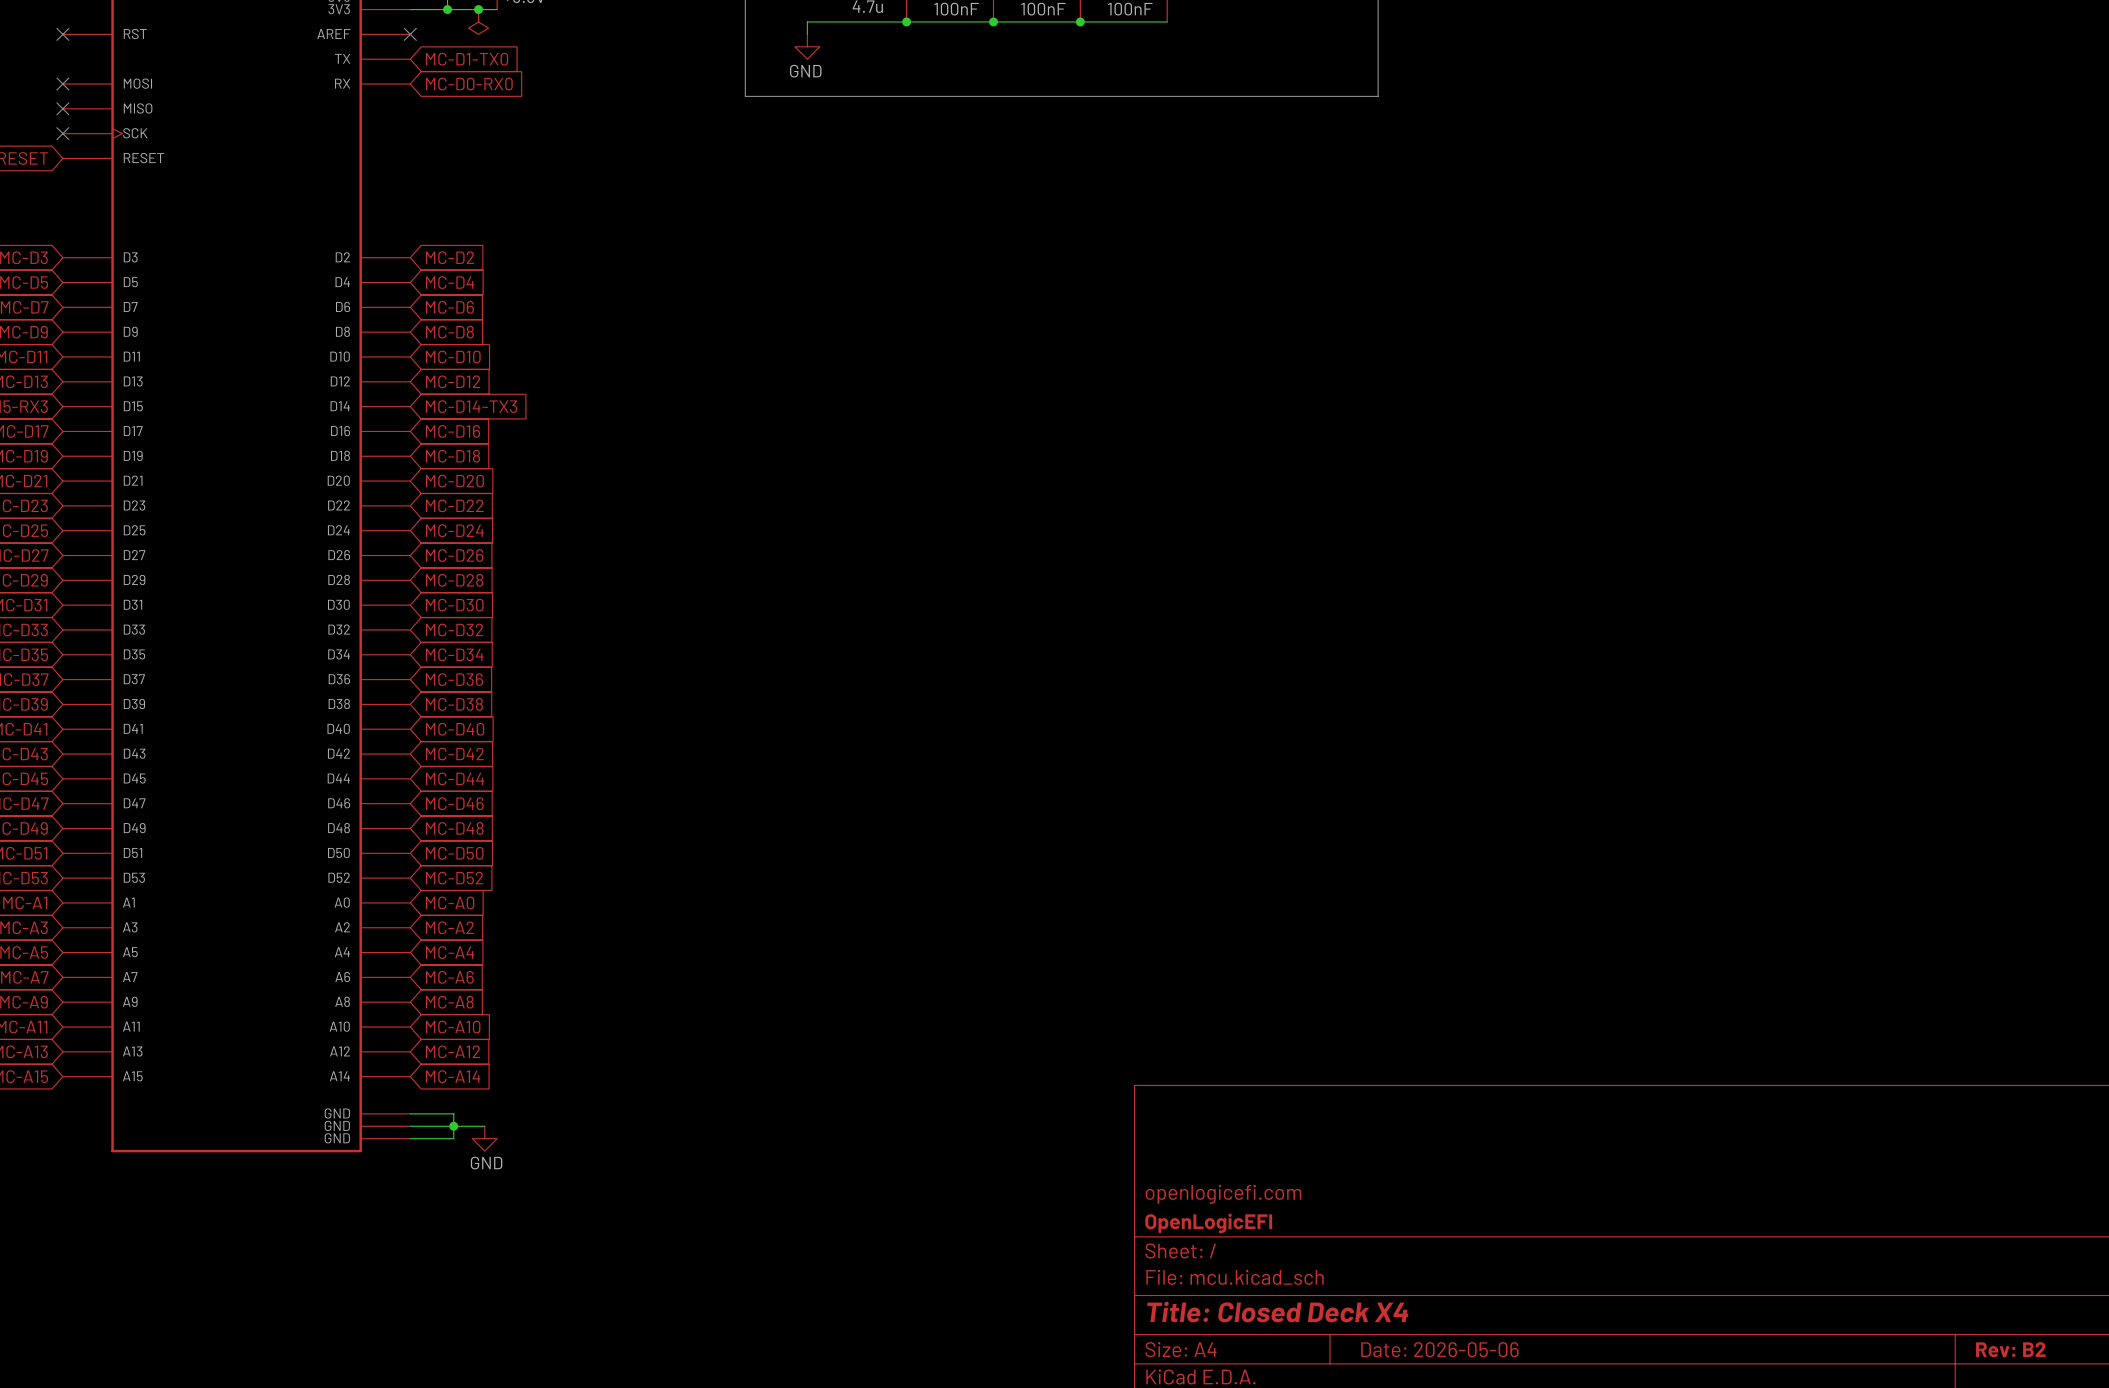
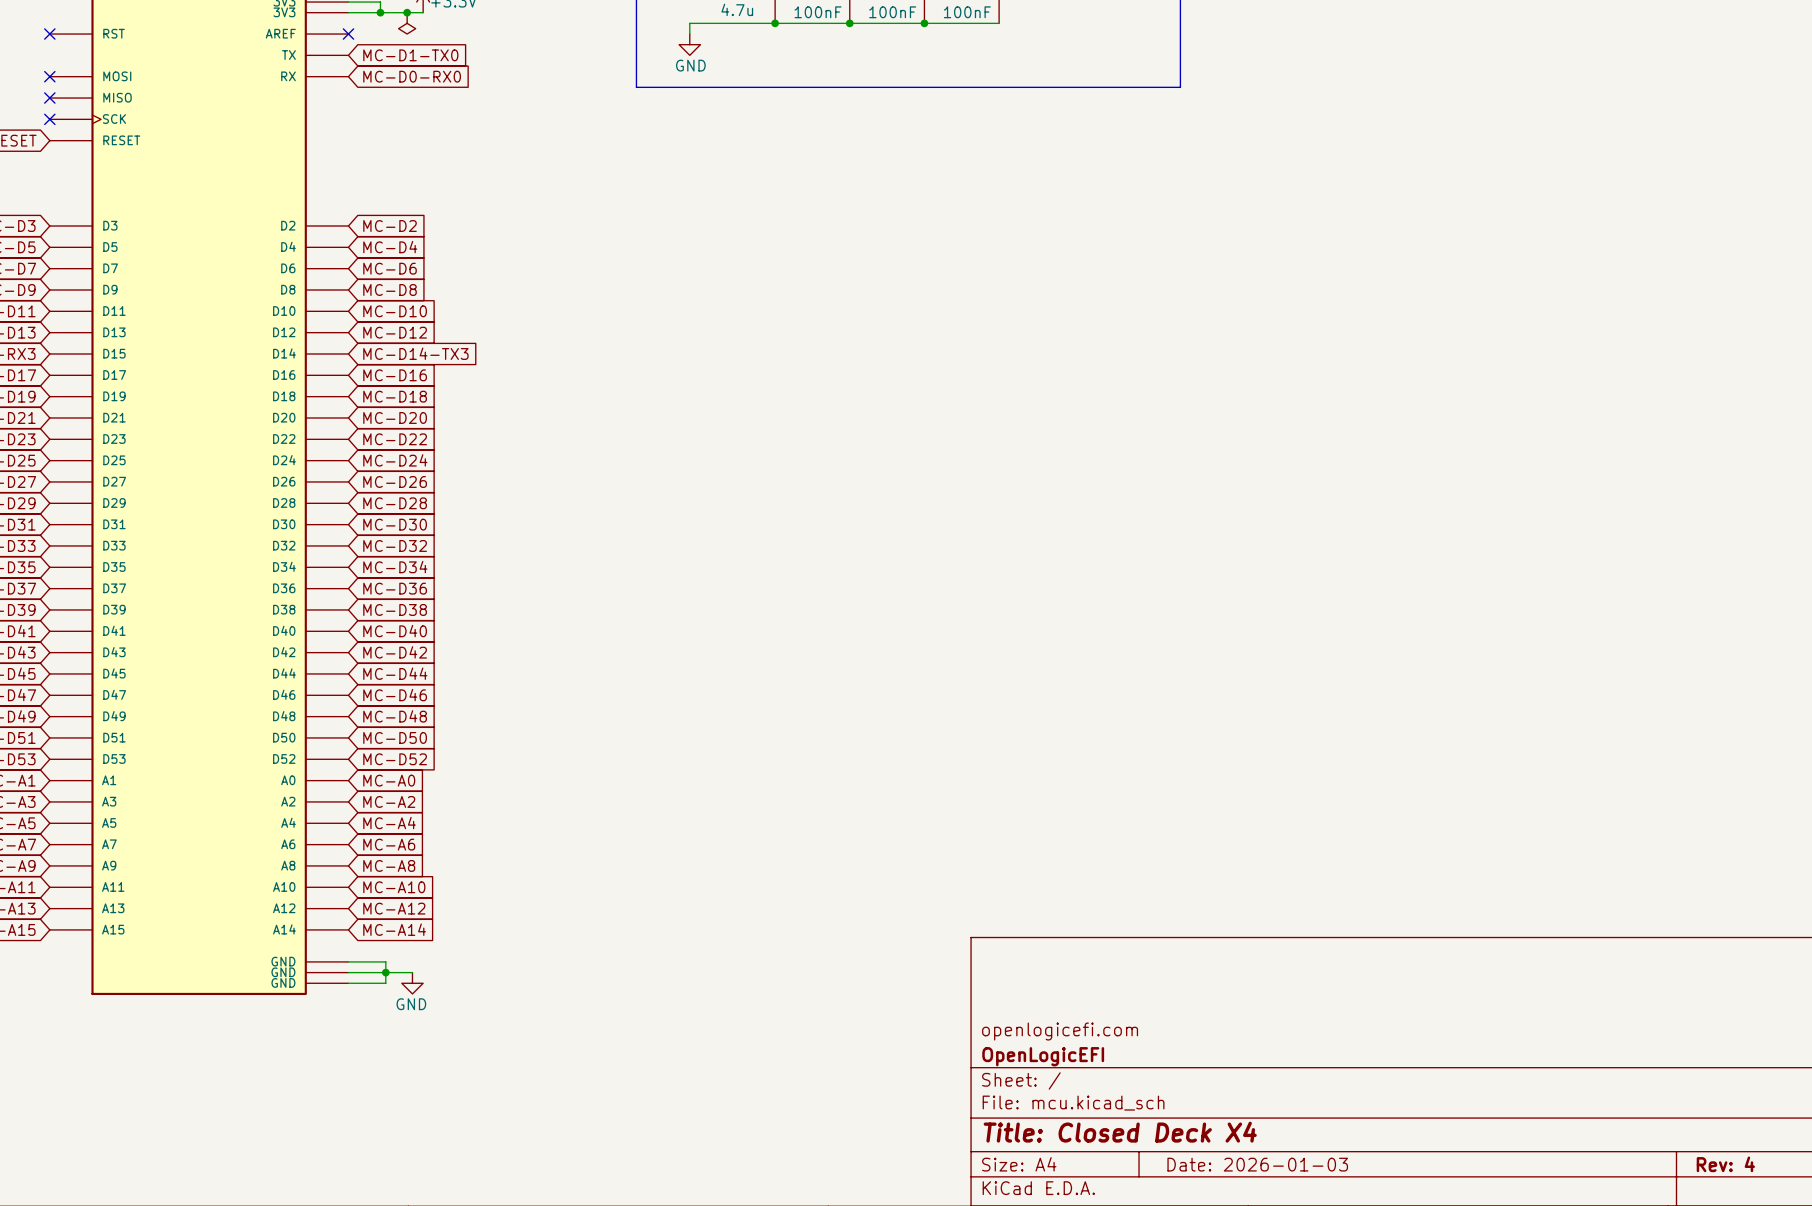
title block: Date: 2026-05-06 (1439, 1349) -> Date: 2026-01-03 (1257, 1164)
title block: Rev: B2 (2010, 1349) -> Rev: 4 (1725, 1164)

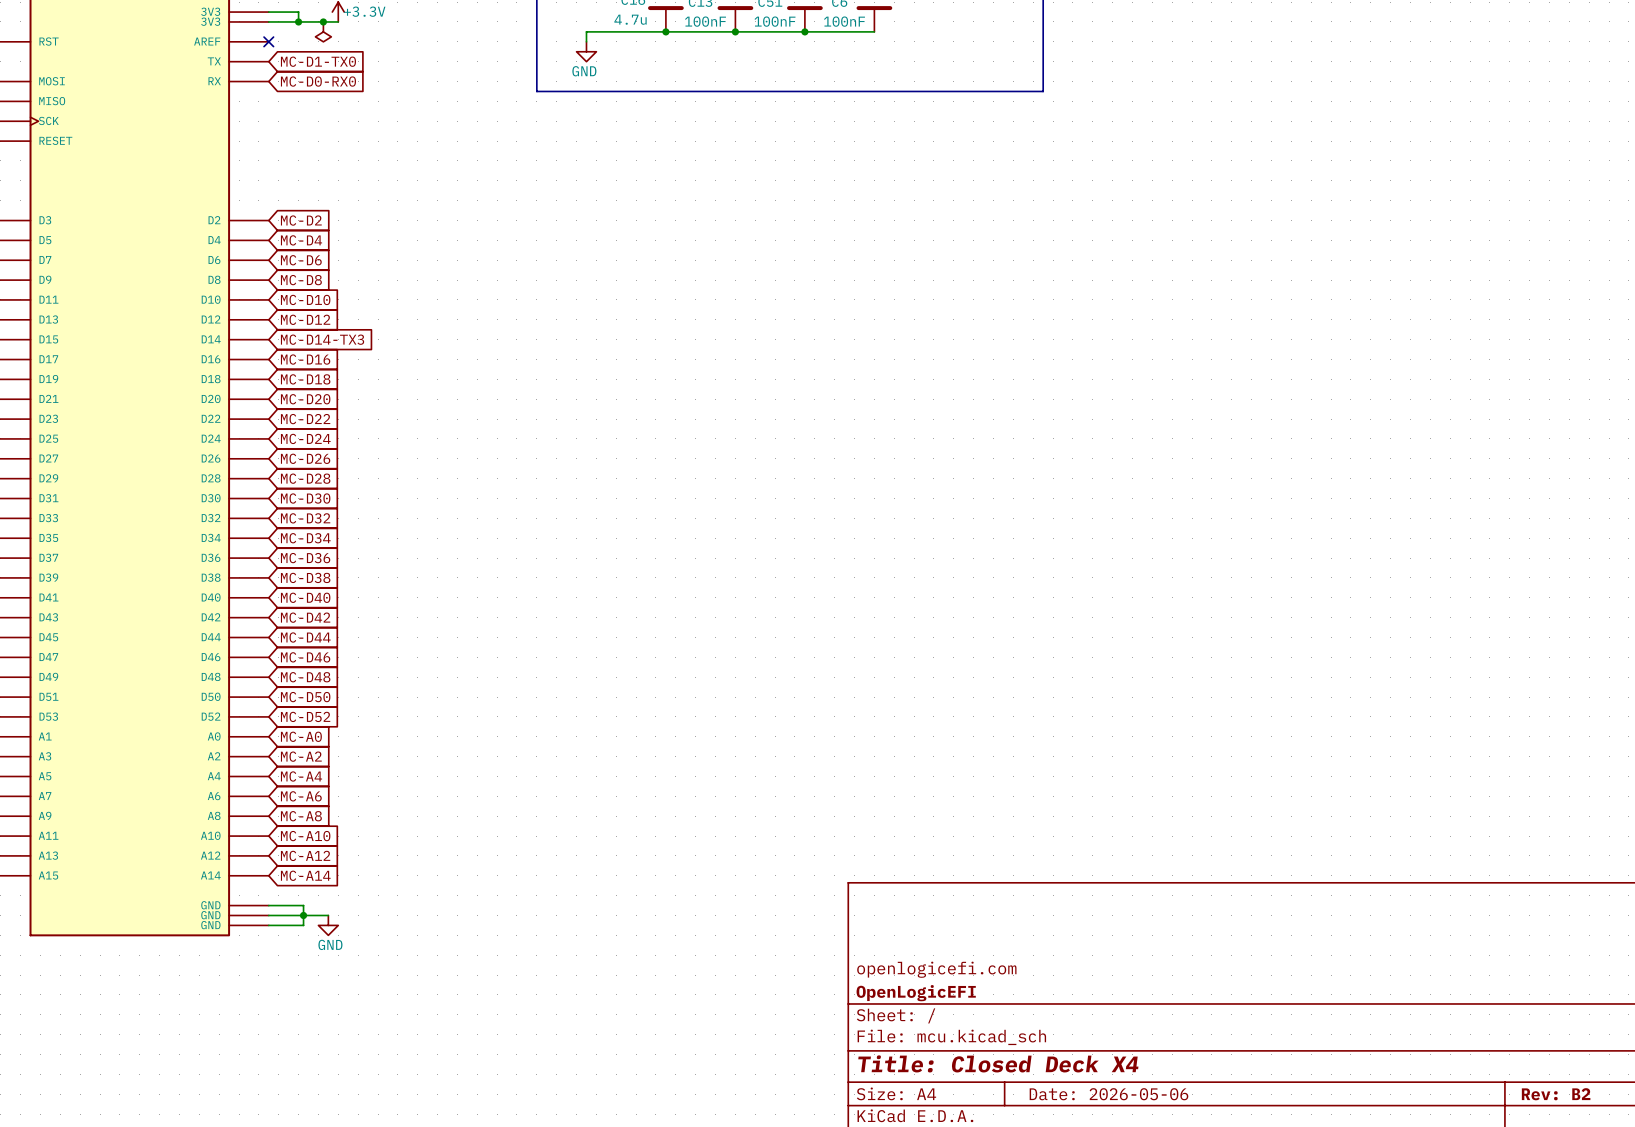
title block: Date: 2026-01-03 (1257, 1164) -> Date: 2026-05-06 (1108, 1094)
title block: Rev: 4 (1725, 1164) -> Rev: B2 (1556, 1094)

